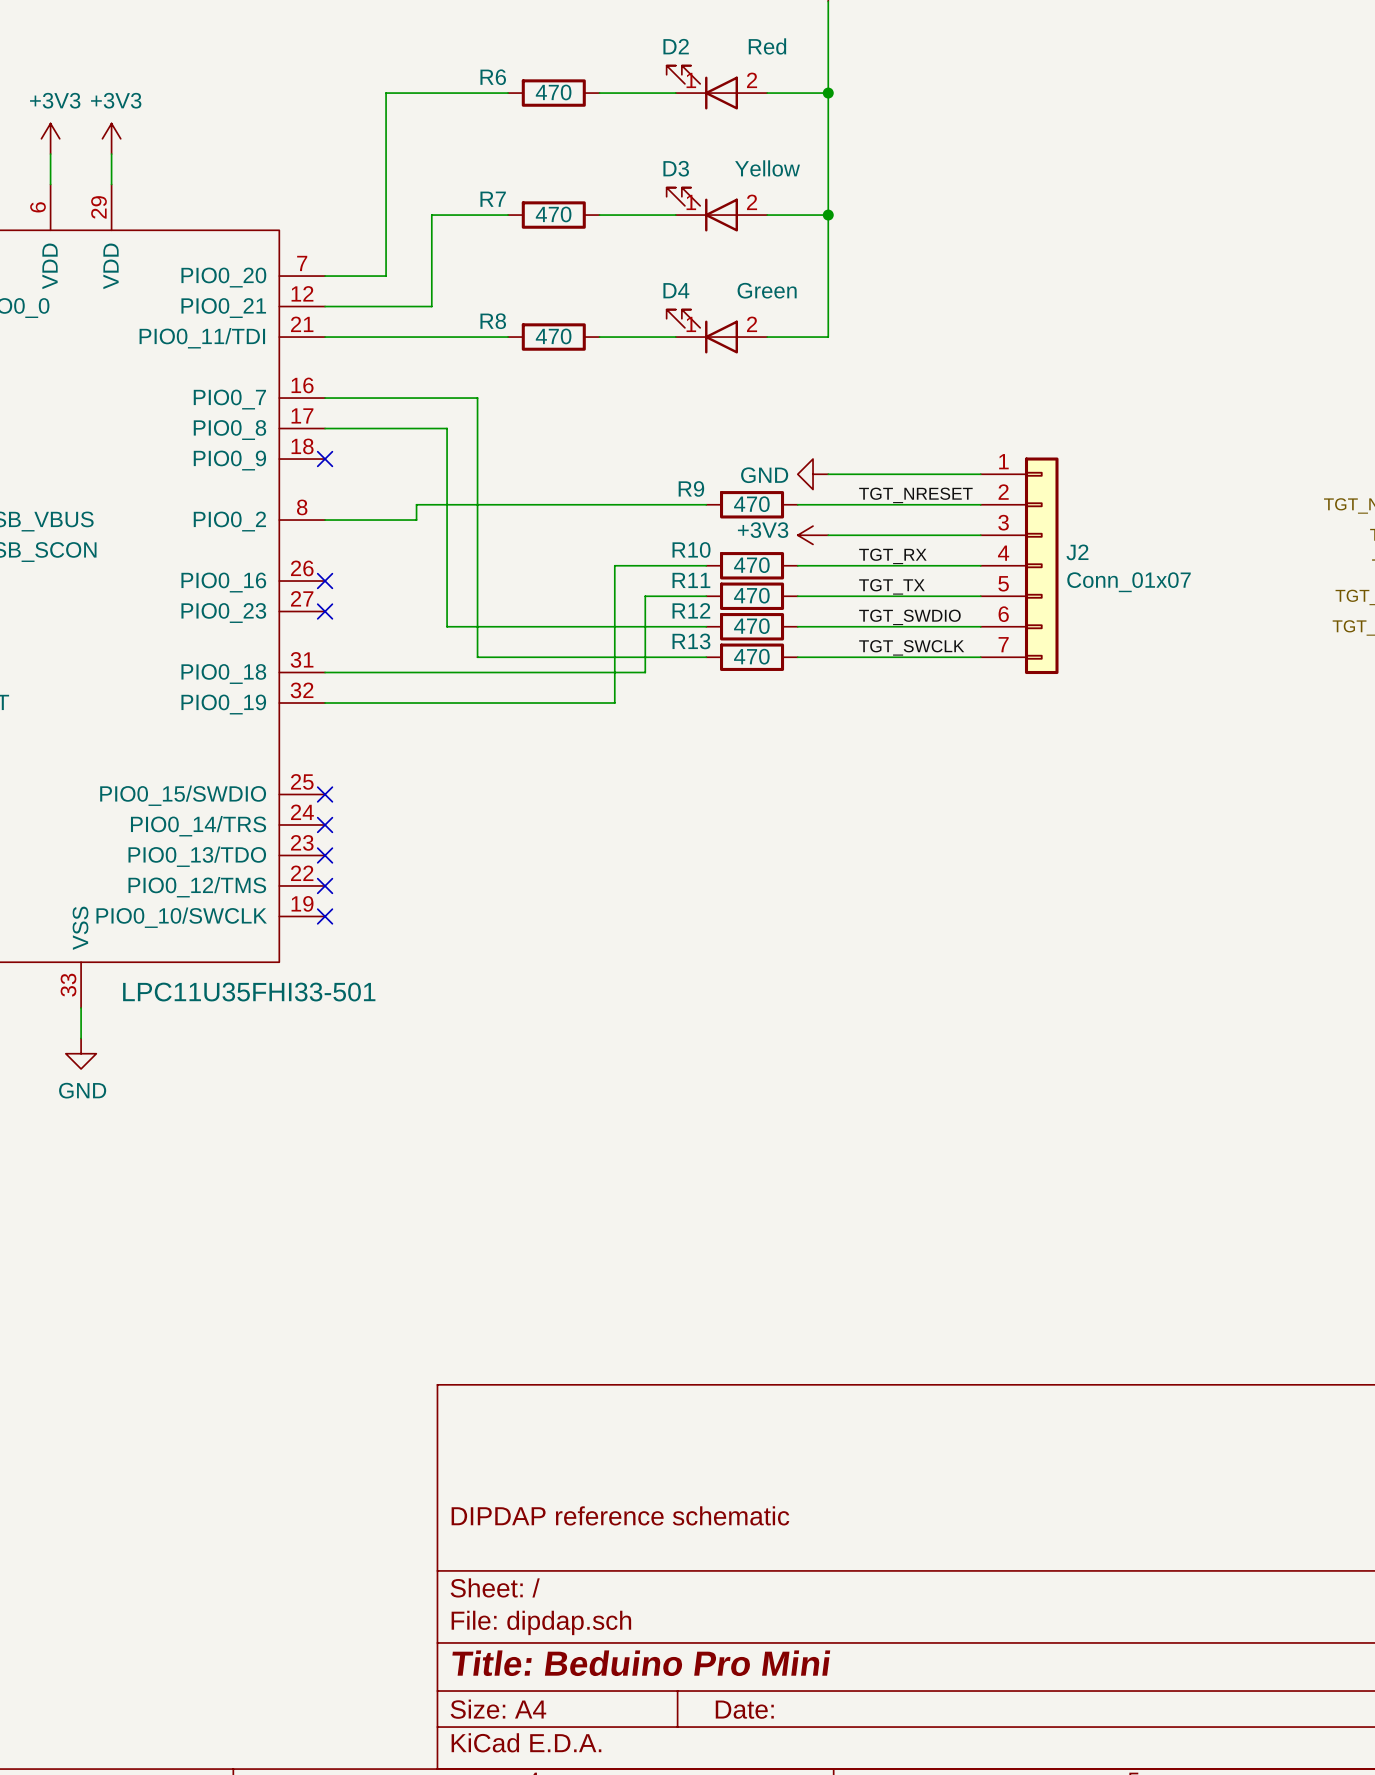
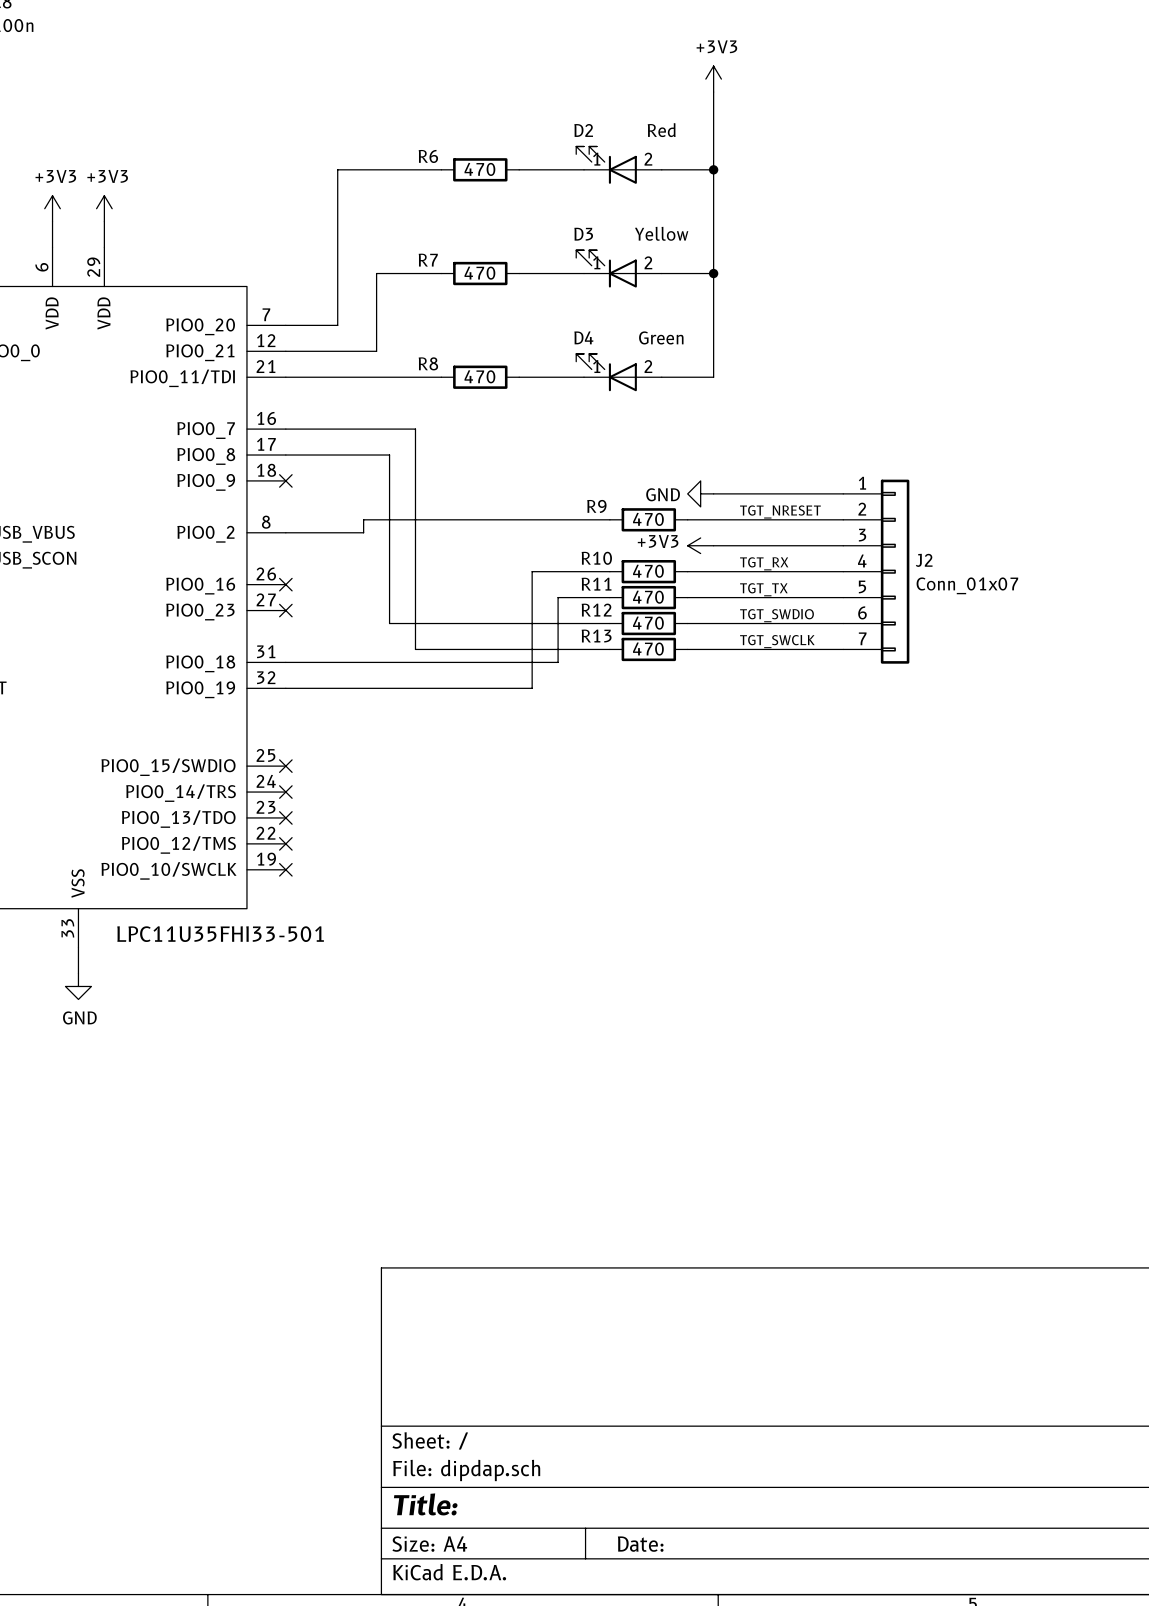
title block: DIPDAP reference schematic (620, 1515) -> none
title block: Title: Beduino Pro Mini (641, 1663) -> Title: (425, 1504)

